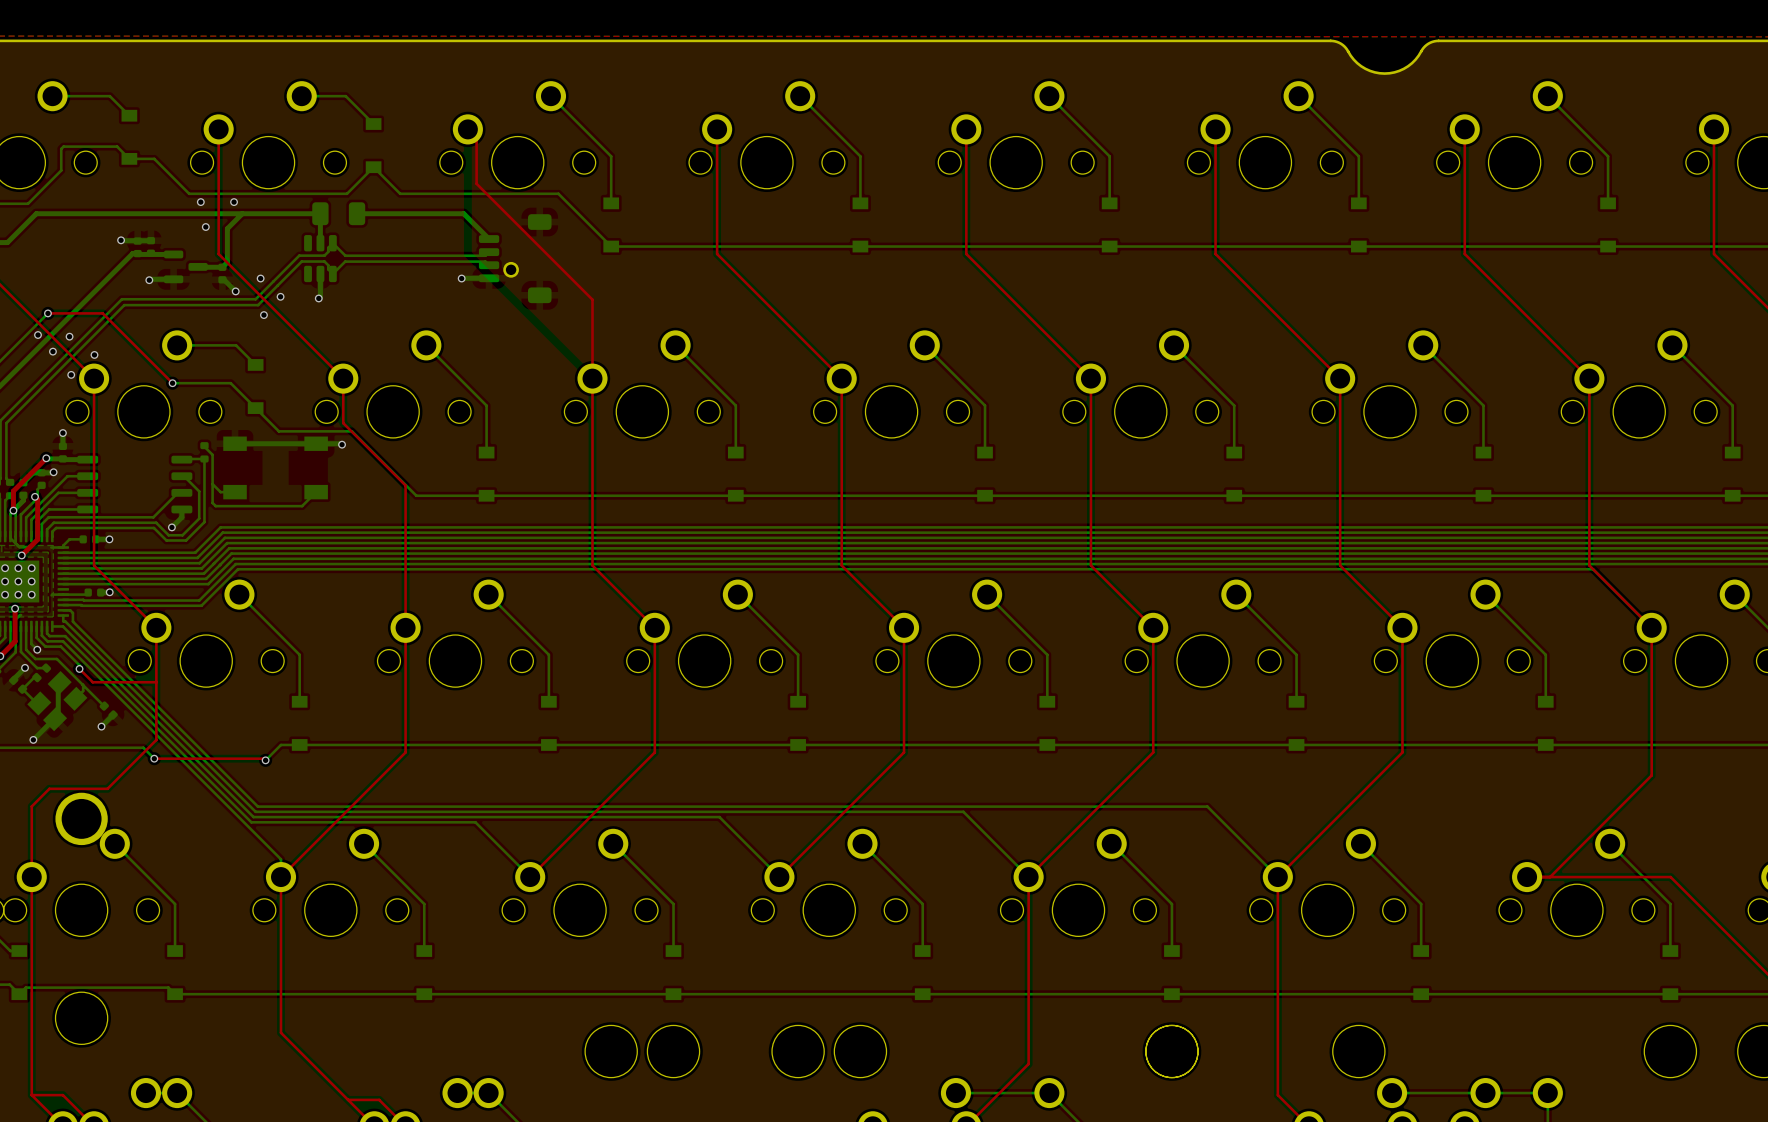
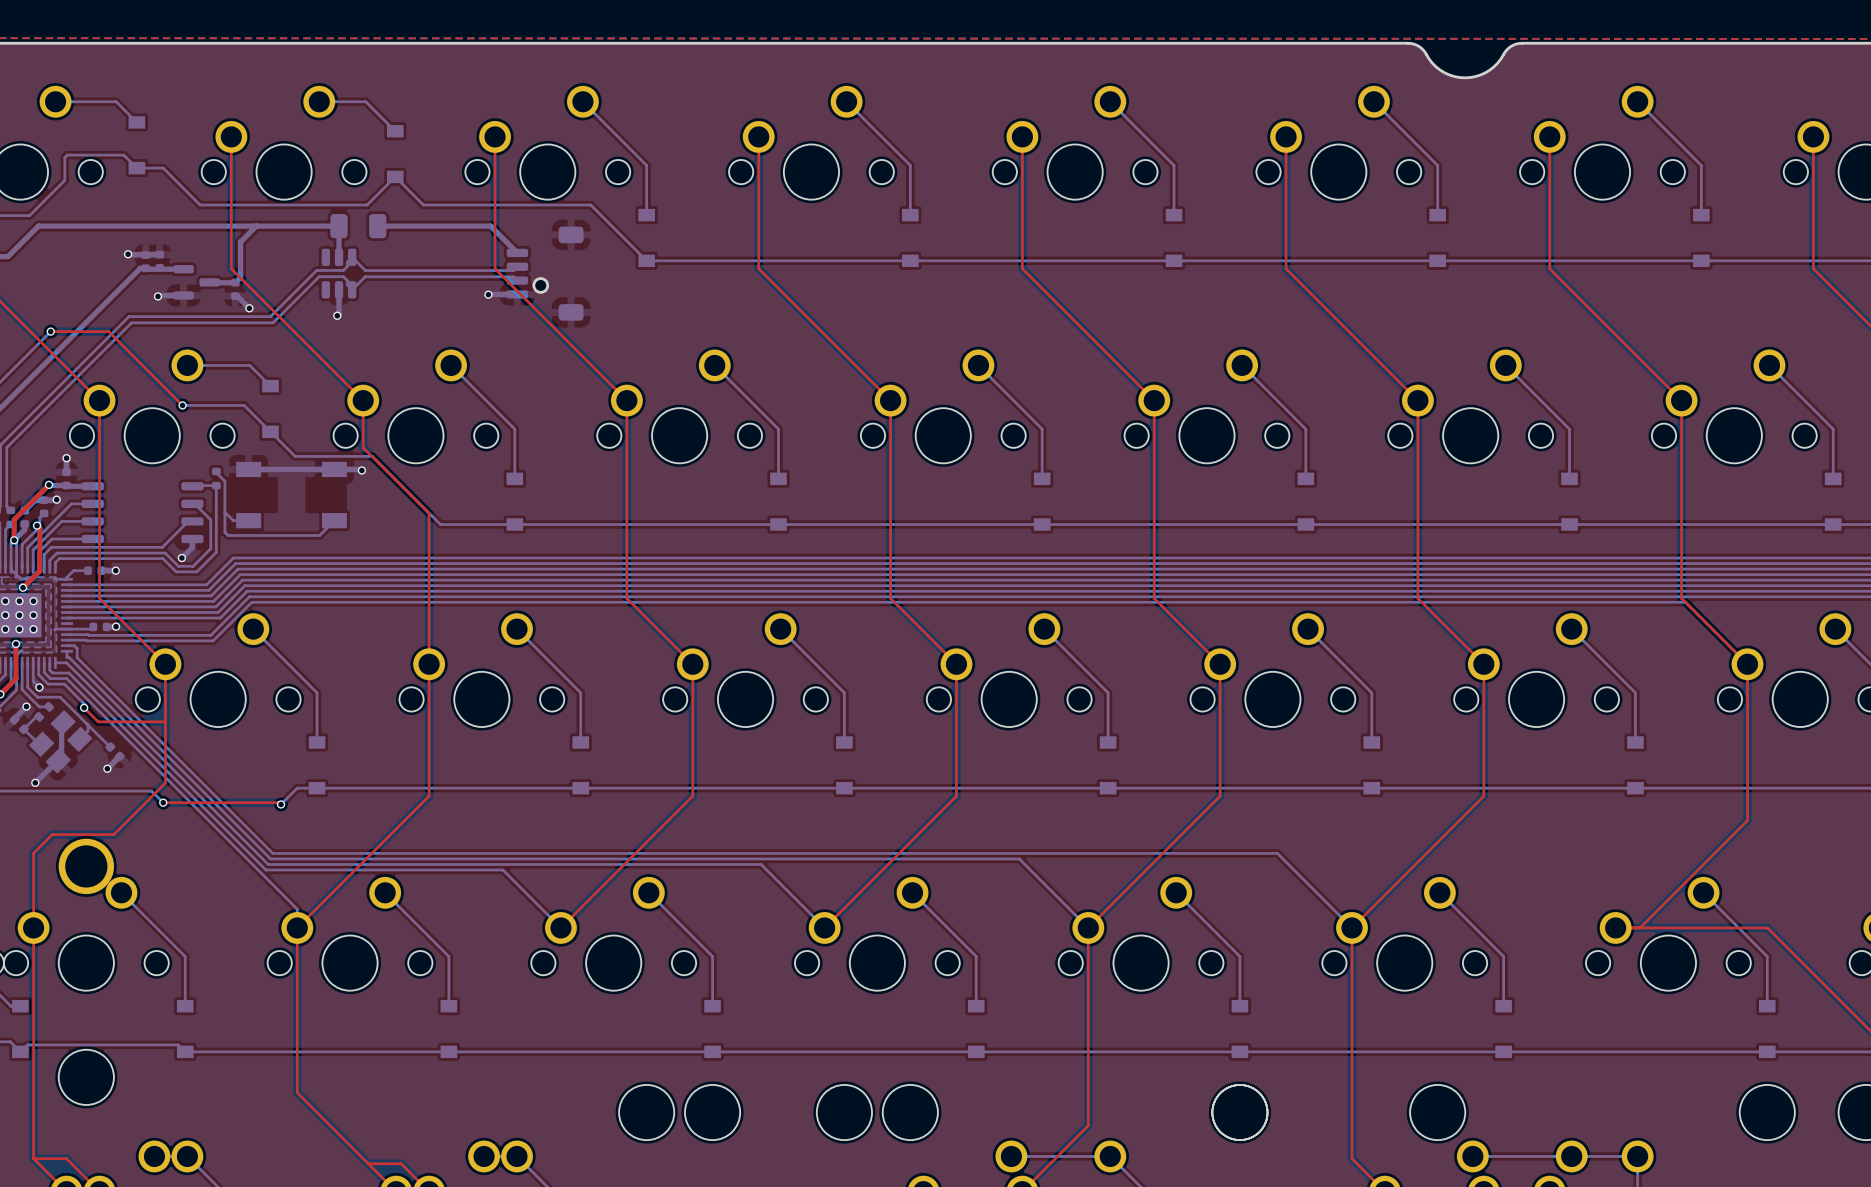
top track: (467, 129) (476, 138) (476, 183) (592, 299) (592, 378) -> (495, 136) (495, 268) (626, 400)
via: (200, 202) -> none
via: (234, 202) -> none
via: (205, 227) -> none
via: (260, 278) -> none
via: (280, 296) -> none
via: (263, 315) -> none
via: (37, 335) -> none
via: (69, 336) -> none
via: (52, 351) -> none
via: (94, 354) -> none
via: (71, 374) -> none

